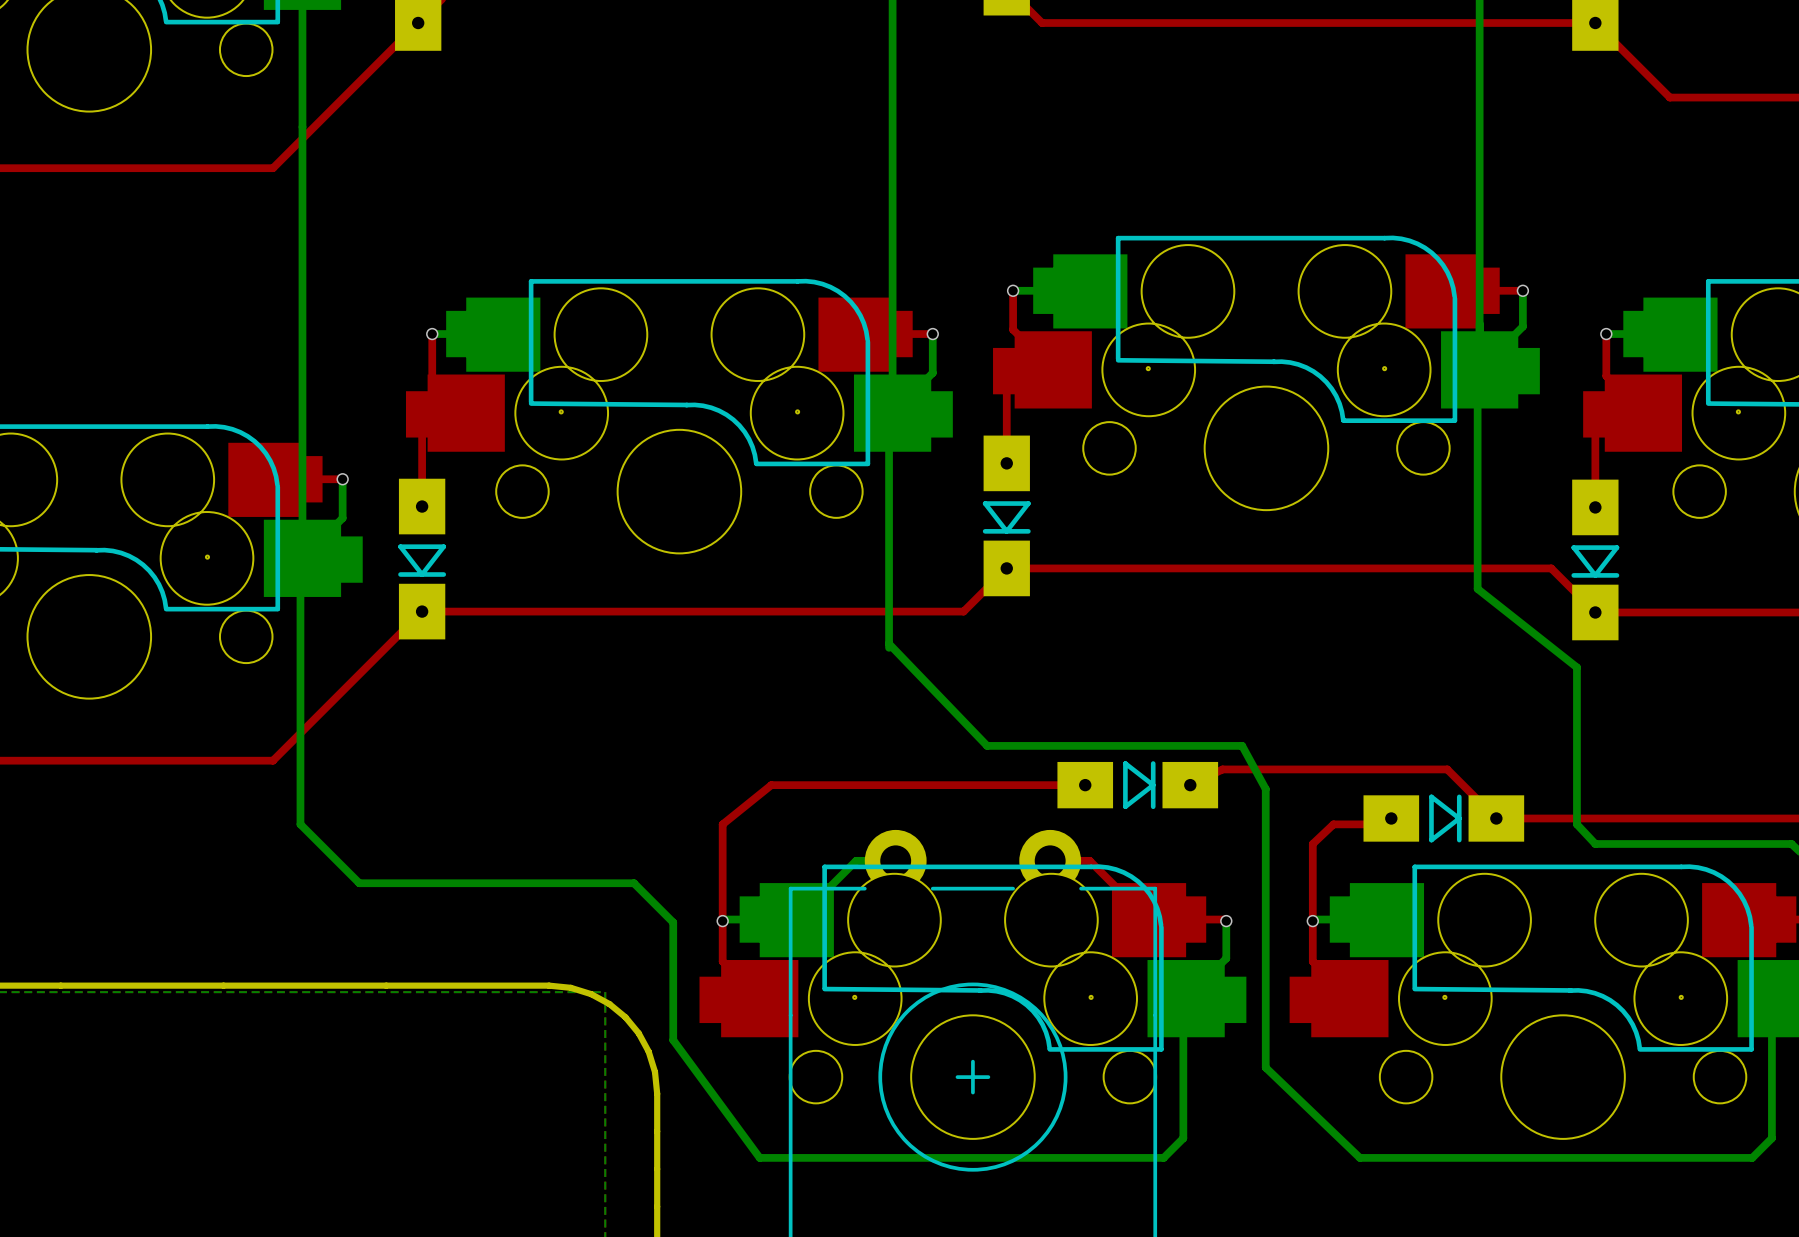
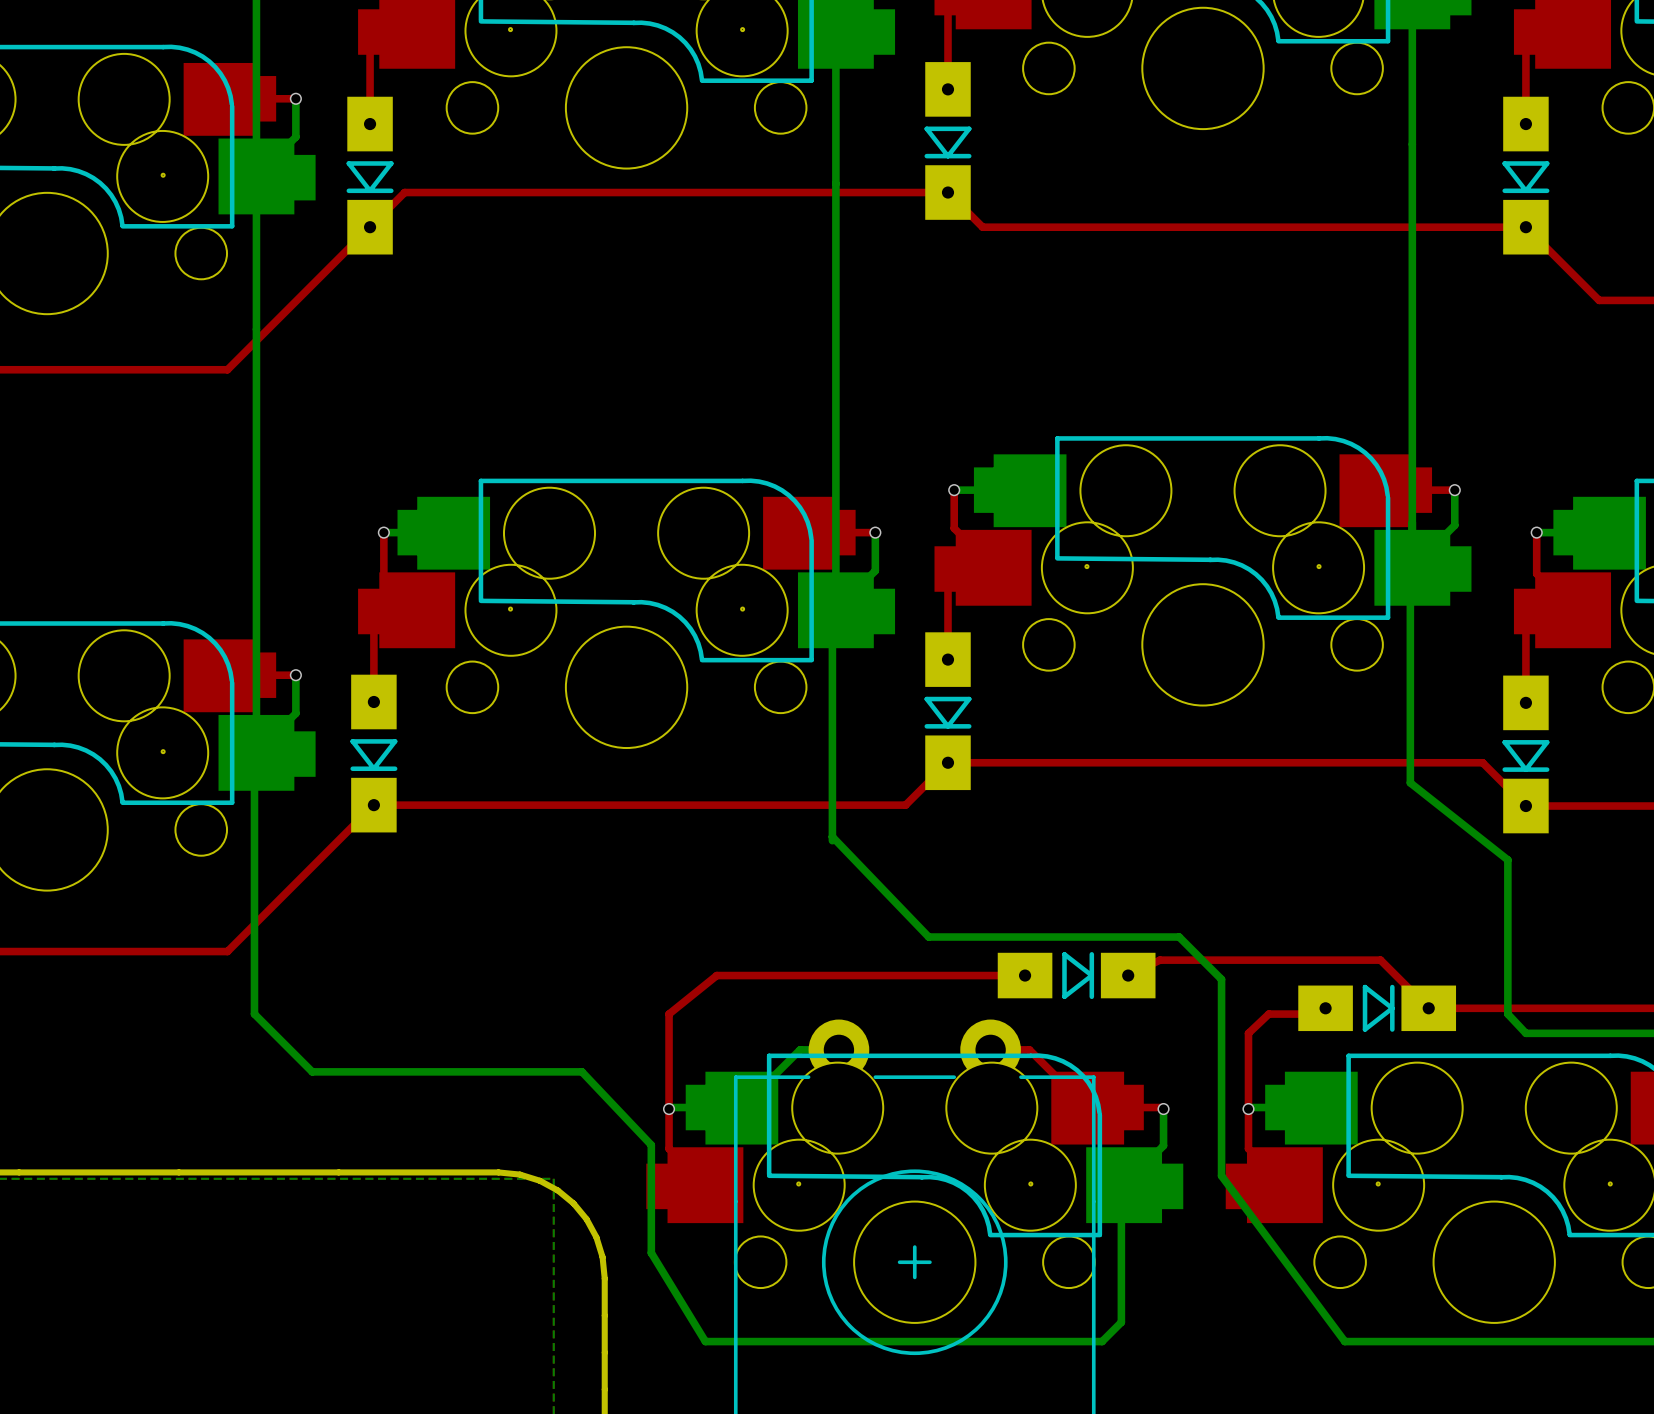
bottom track: (1242, 745) (1265, 789) (1265, 1067) (1359, 1157) (1410, 1157) -> (1179, 937) (1221, 979) (1221, 1175) (1344, 1341)
bottom track: (634, 883) (673, 922) (673, 1040) (759, 1157) -> (581, 1071) (651, 1145) (651, 1252) (705, 1341)

